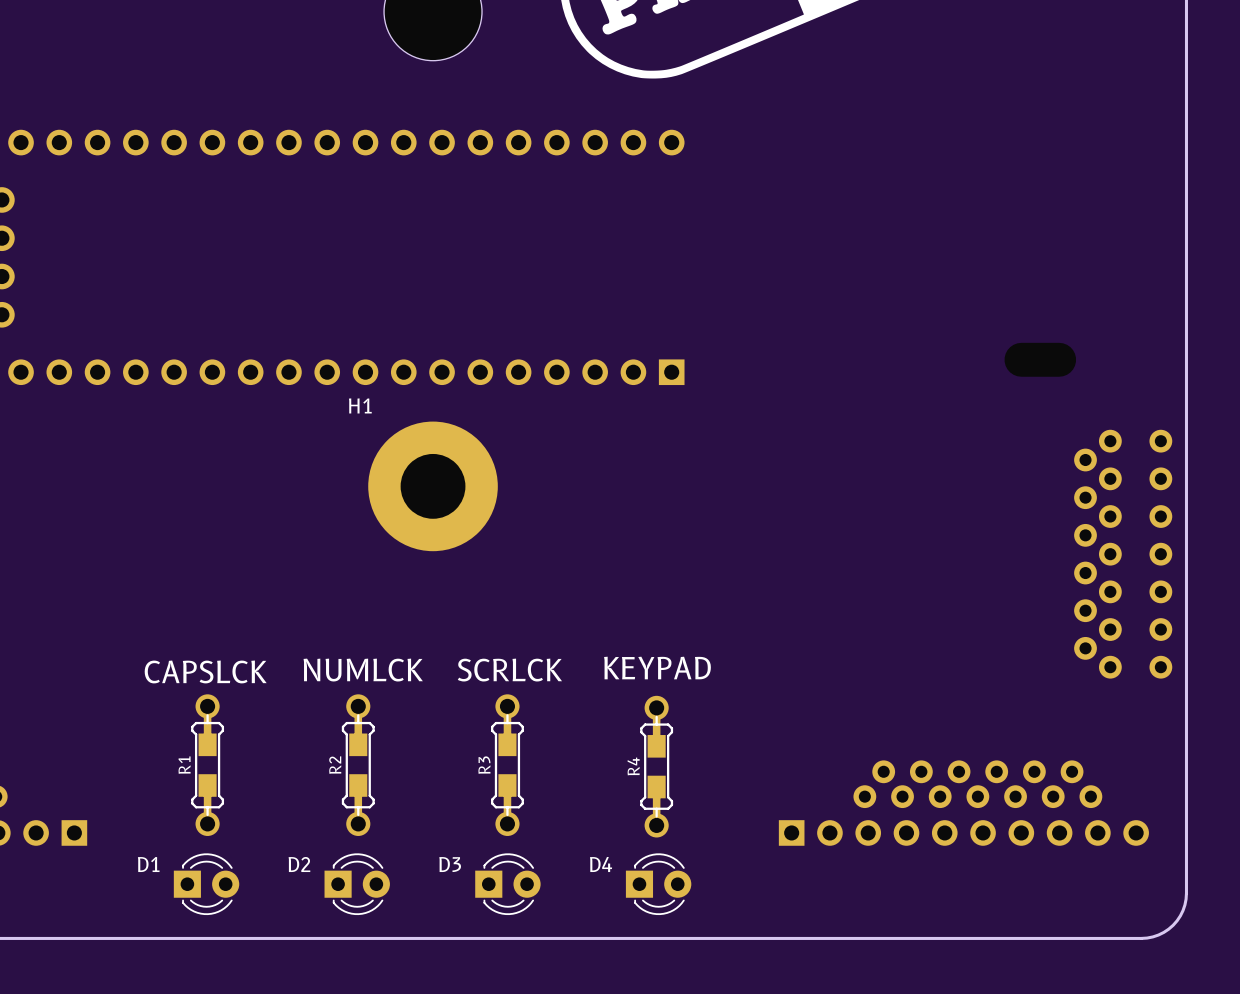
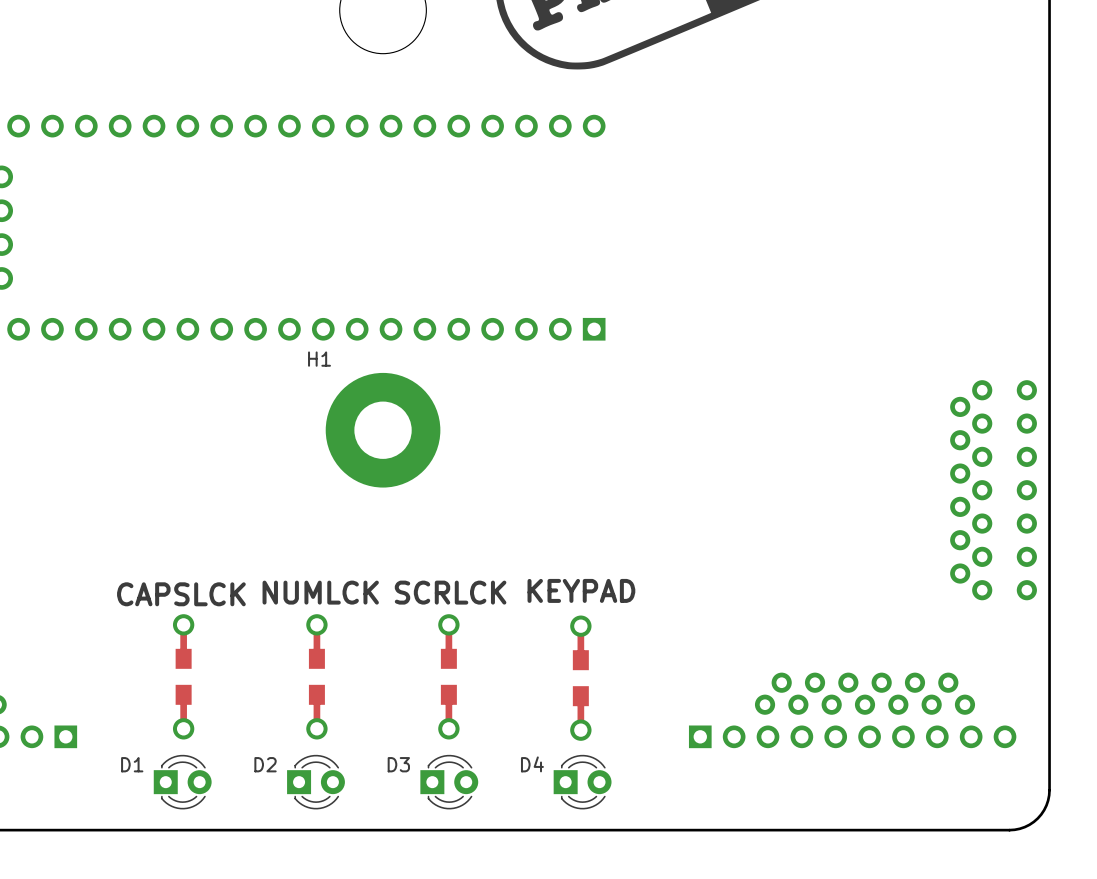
R1 side: top (207, 765) -> bottom (183, 676)
R2 side: top (358, 765) -> bottom (316, 676)
R3 side: top (507, 765) -> bottom (448, 676)
R4 side: top (656, 766) -> bottom (580, 678)

